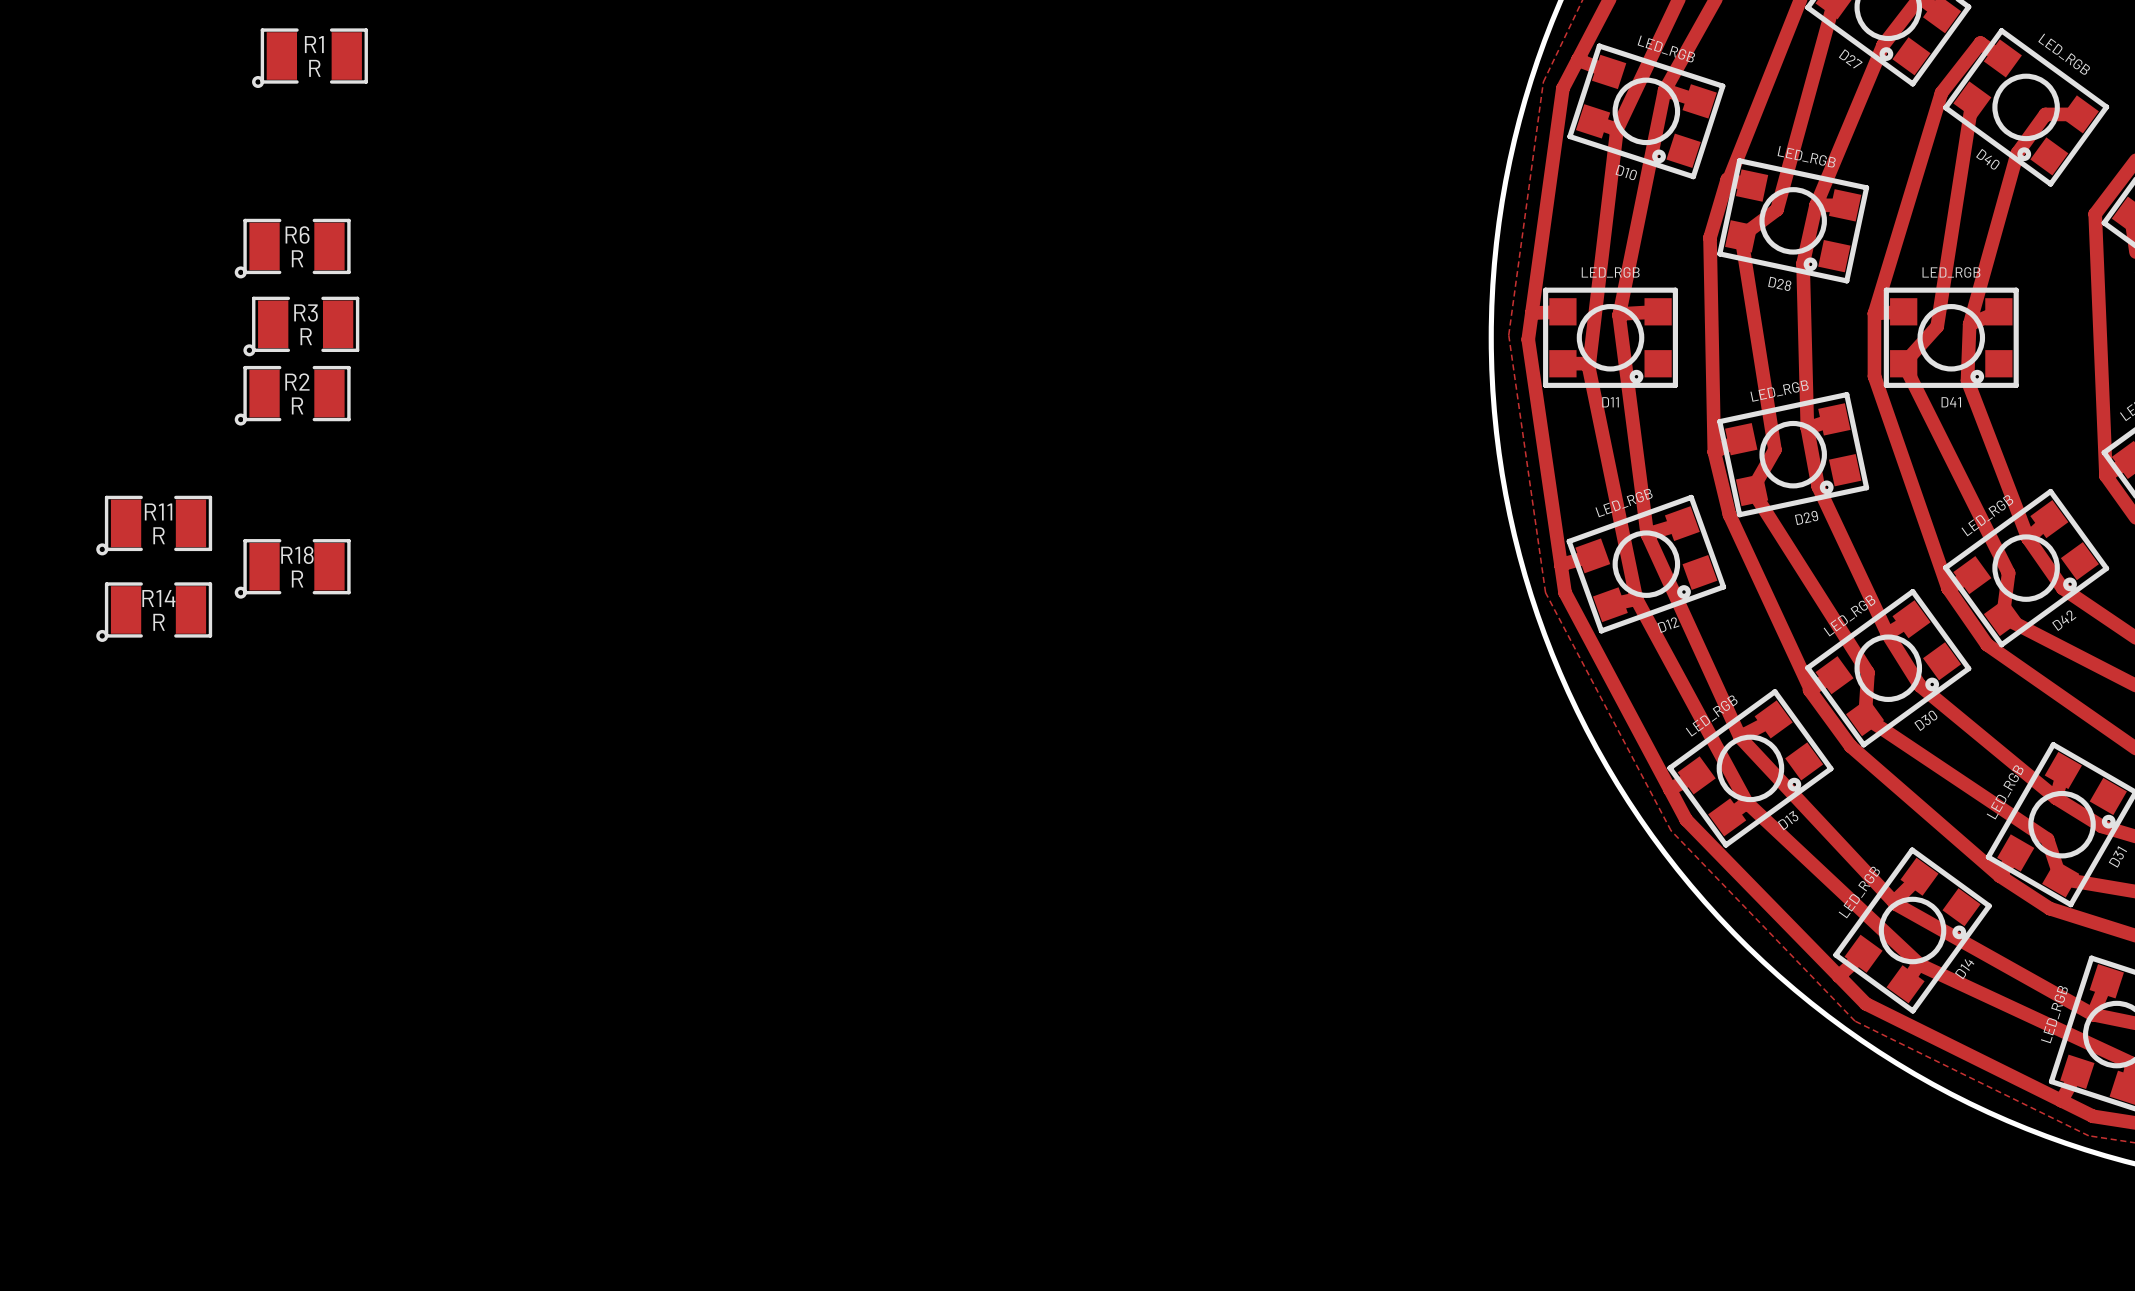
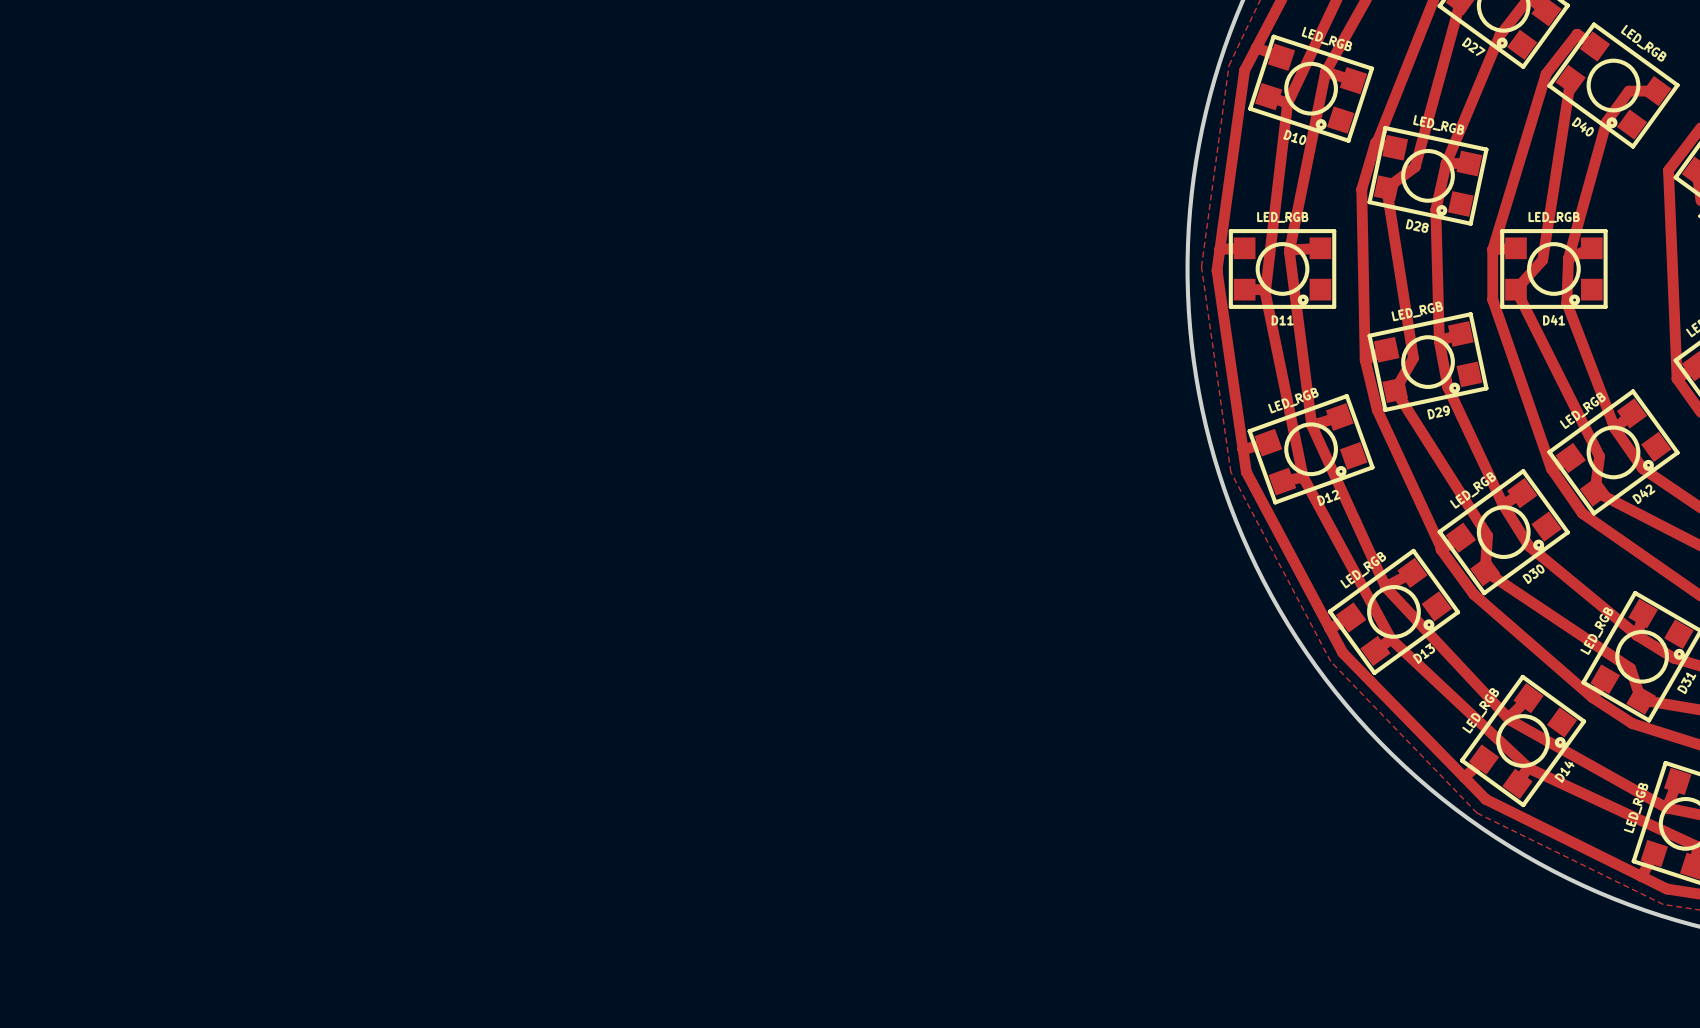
R1: R (309, 58) -> none
R6: R (292, 248) -> none
R3: R (301, 326) -> none
R2: R (292, 395) -> none
R11: R (154, 525) -> none
R18: R (292, 568) -> none
R14: R (154, 612) -> none

